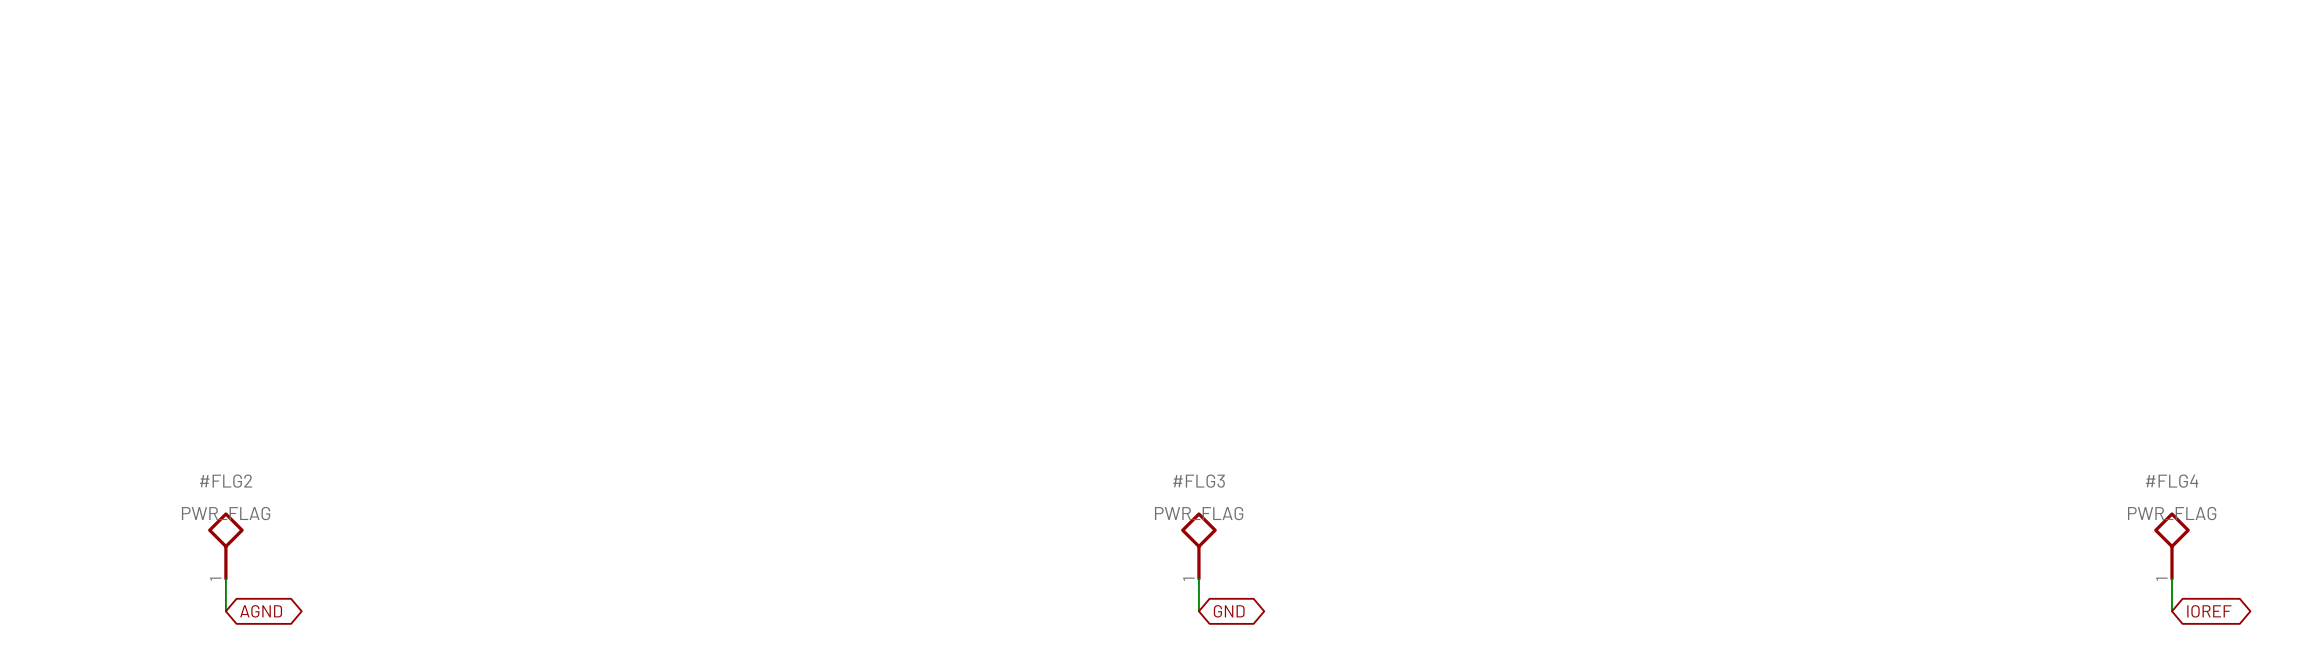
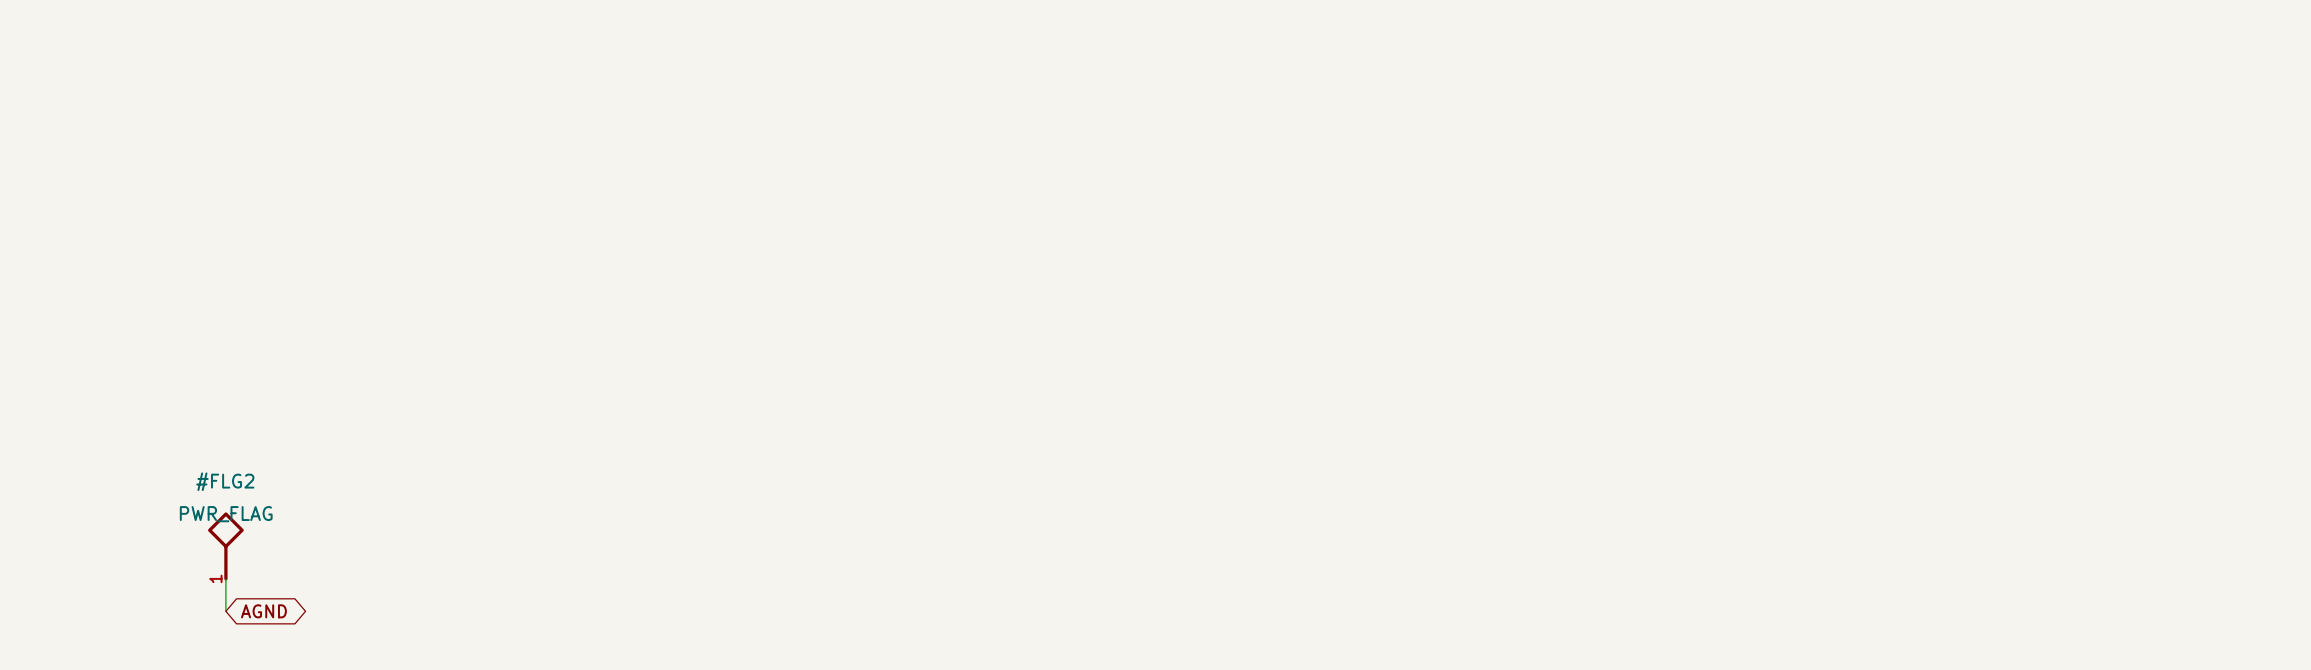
#FLG3: PWR_FLAG (1198, 546) -> none
#FLG4: PWR_FLAG (2171, 546) -> none
wire: (1198, 578) (1198, 611) -> none
wire: (2171, 578) (2171, 611) -> none
global label: GND (1229, 611) -> none
global label: IOREF (2209, 611) -> none

